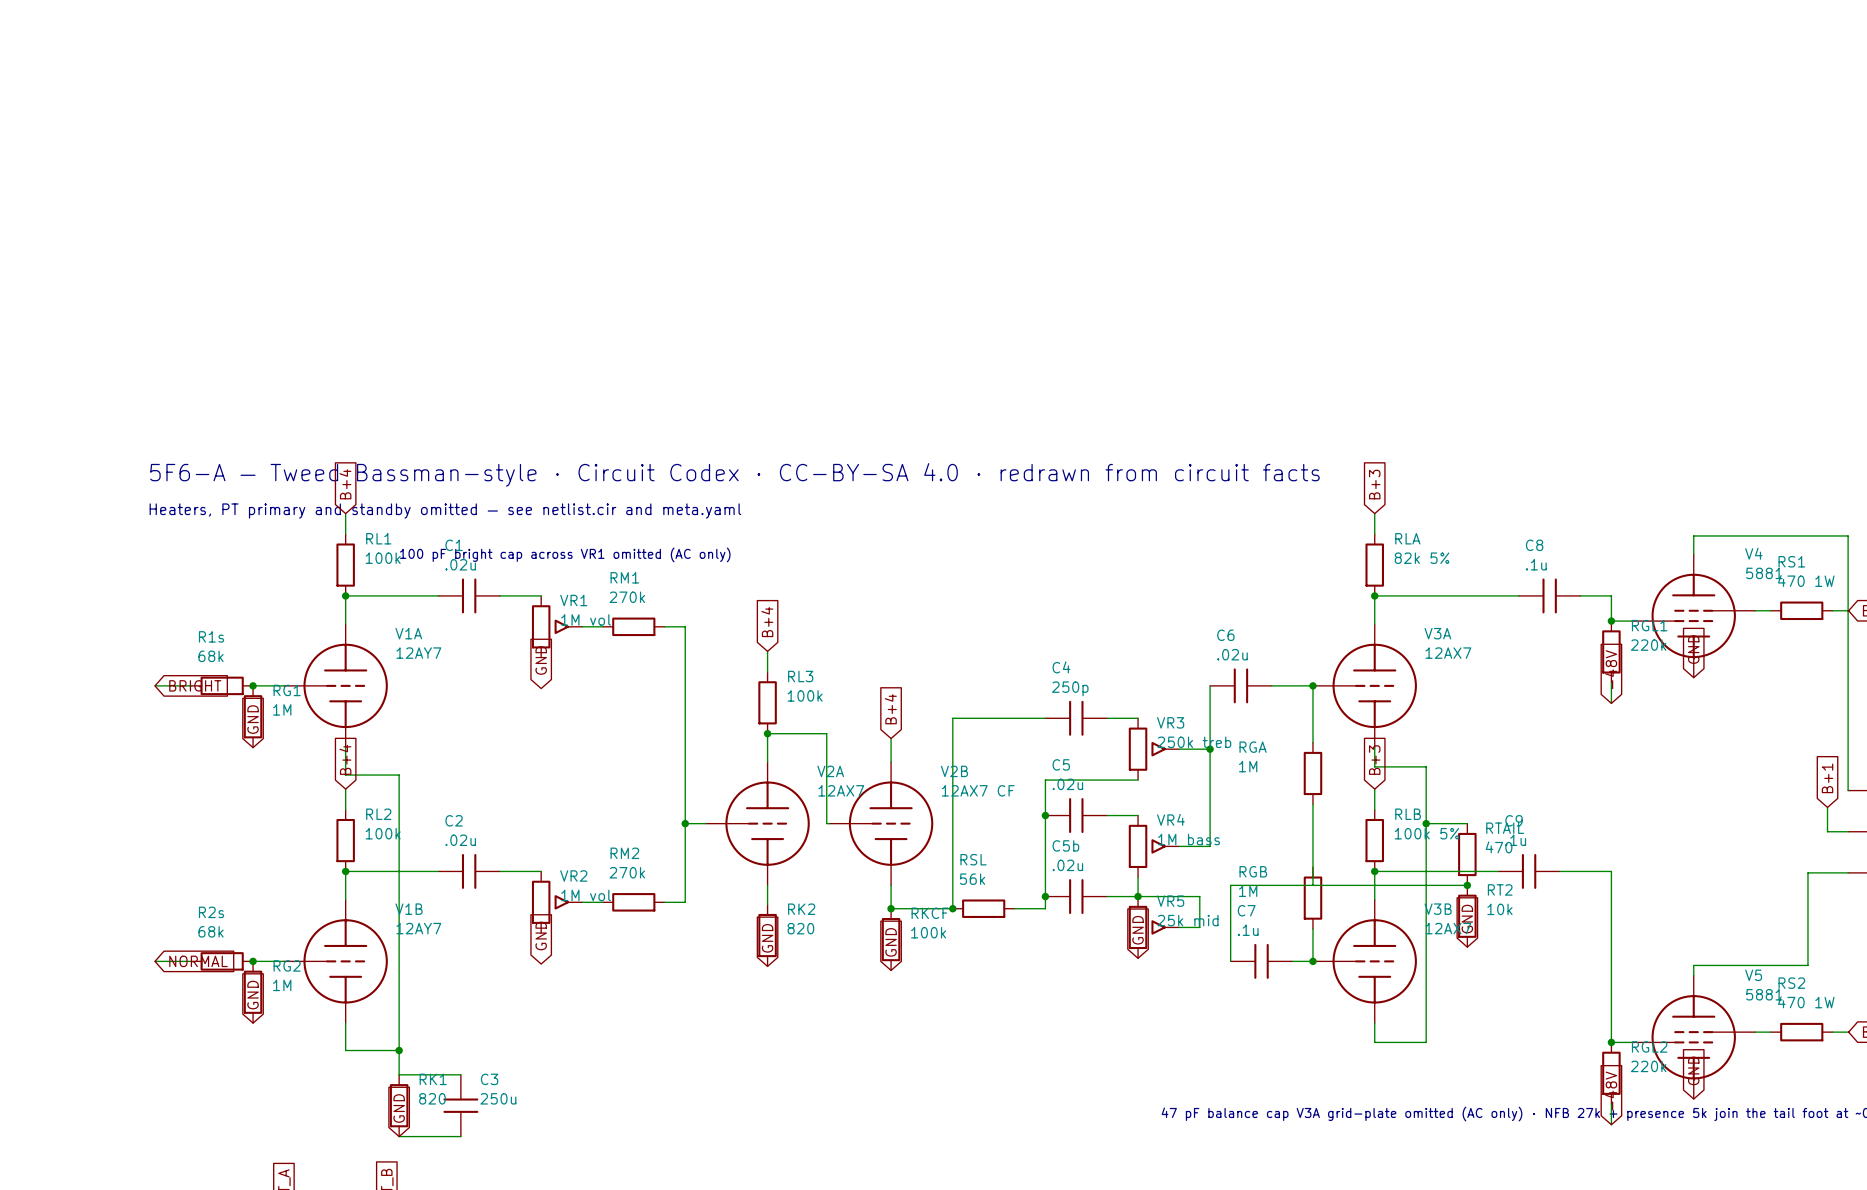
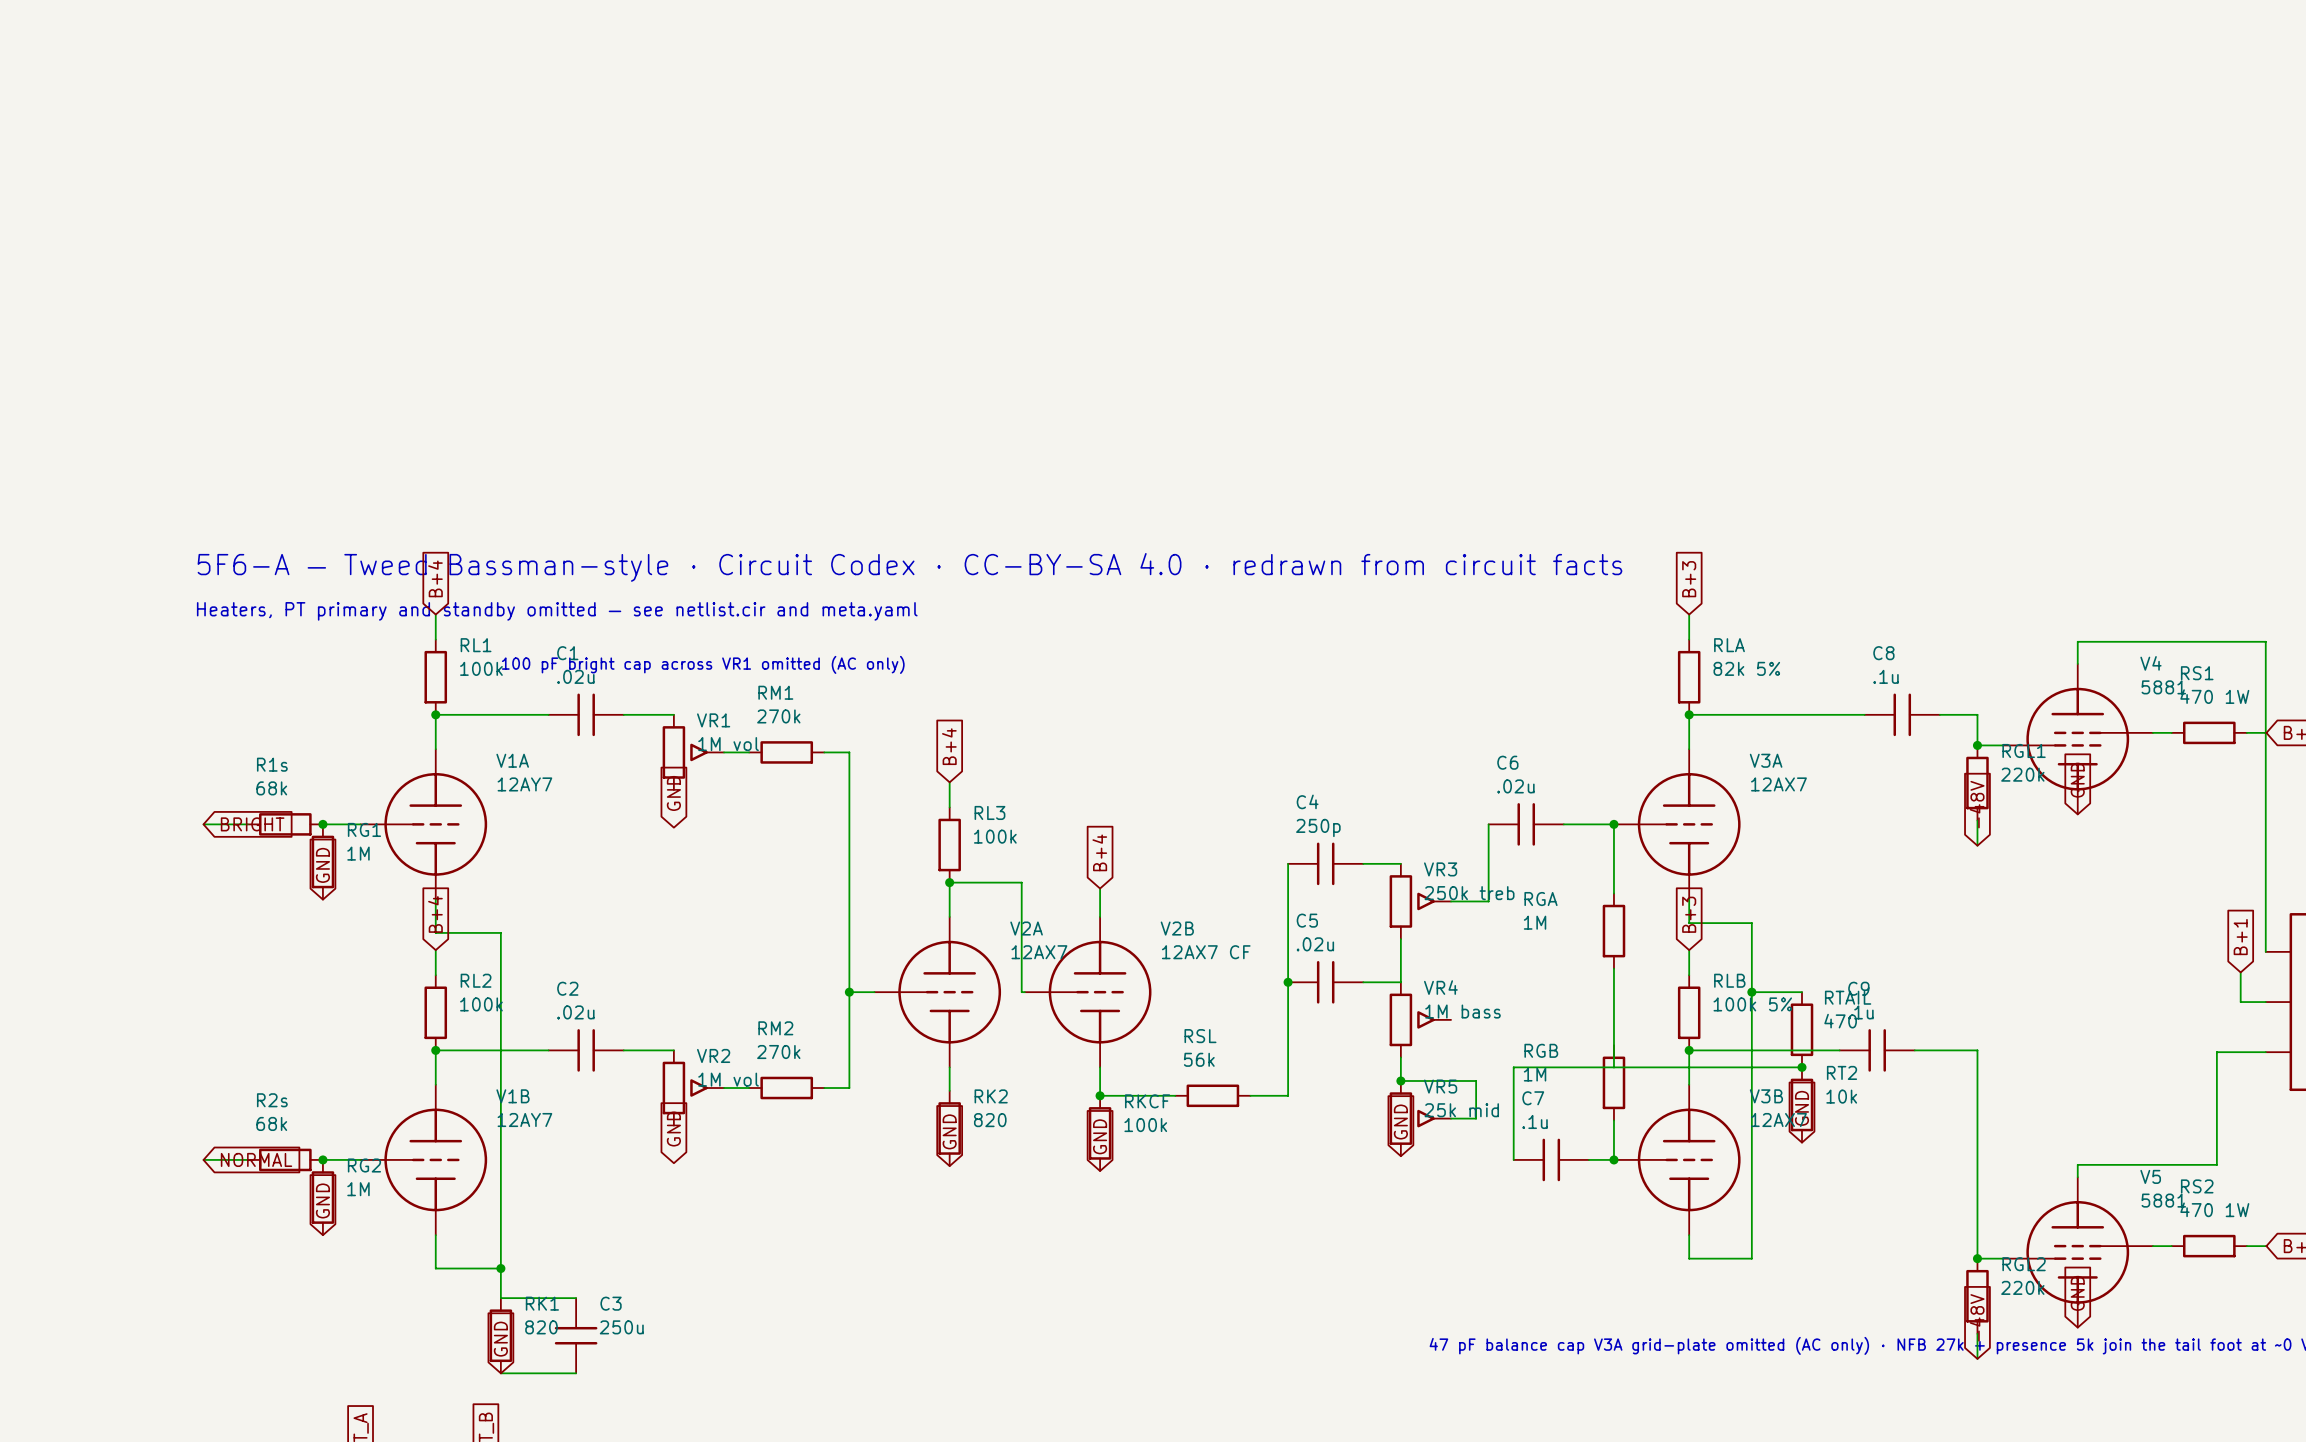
wire: (1045, 718) (952, 718) (952, 908) -> (1288, 863) (1288, 939)
wire: (1210, 749) (1210, 846) (1179, 846) -> none
junction: (1210, 749) -> none
wire: (1045, 780) (1138, 780) -> (1400, 982) (1400, 939)
junction: (1045, 896) -> none
C5b: .02u (1076, 896) -> none
wire: (1107, 896) (1138, 896) -> none
junction: (952, 908) -> none

